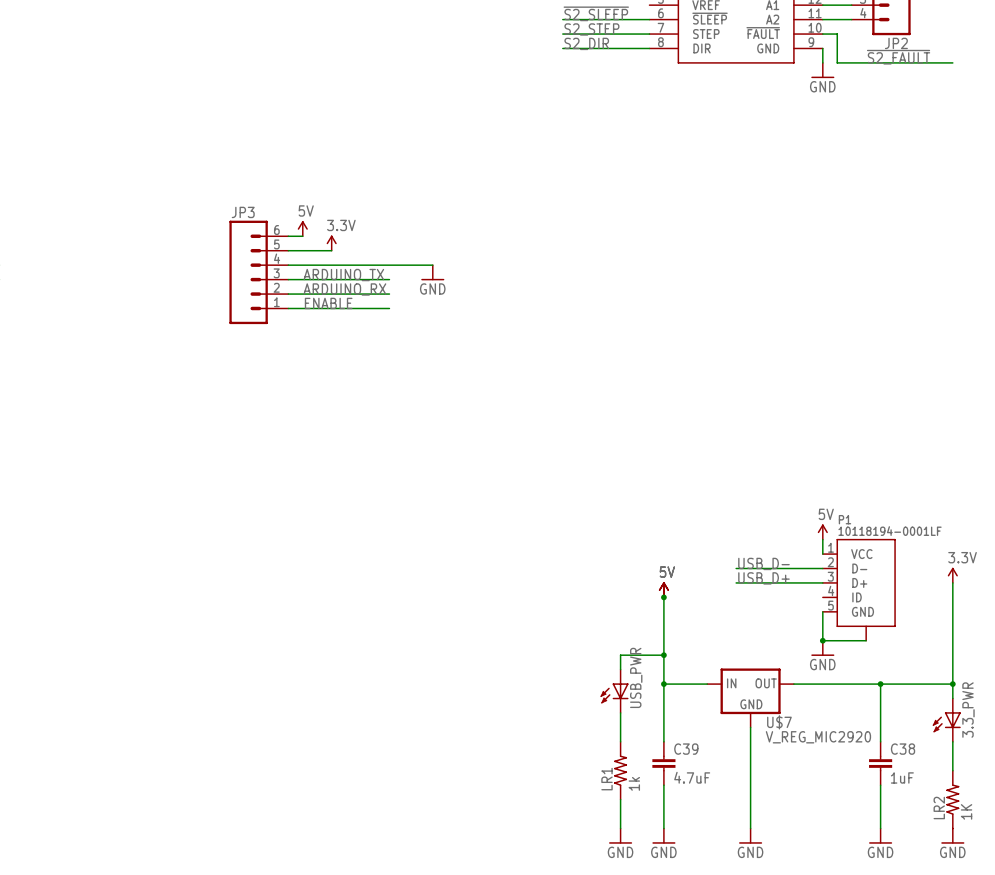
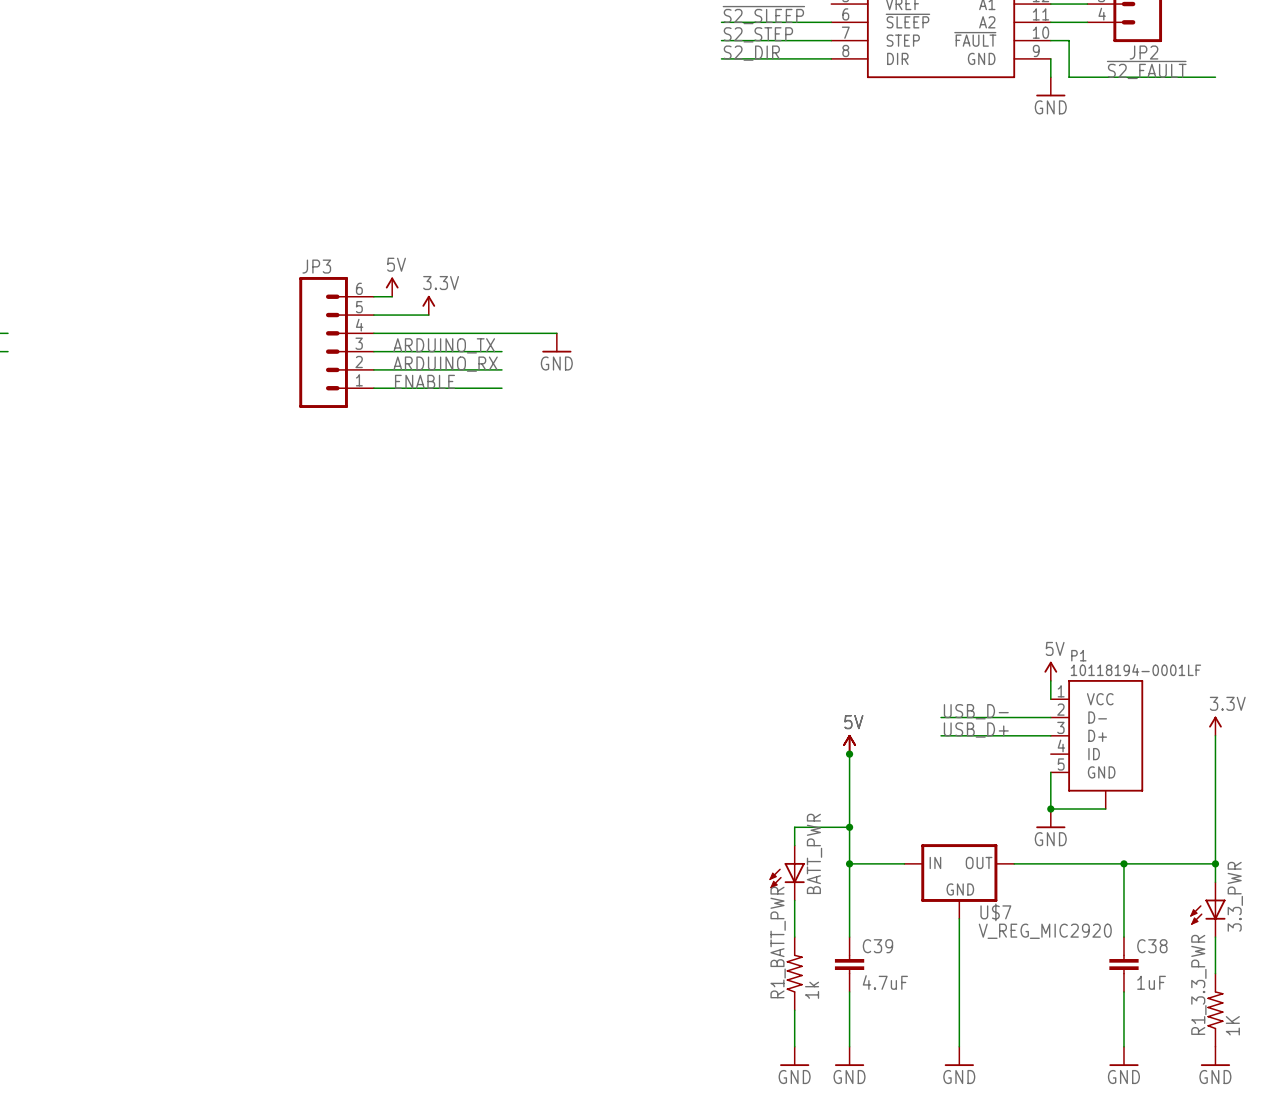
USB_PWR name: USB_PWR (636, 677) -> BATT_PWR (814, 853)
LR1 name: LR1 (607, 779) -> R1_BATT_PWR (778, 942)
LR2 name: LR2 (939, 807) -> R1_3.3_PWR (1198, 984)

